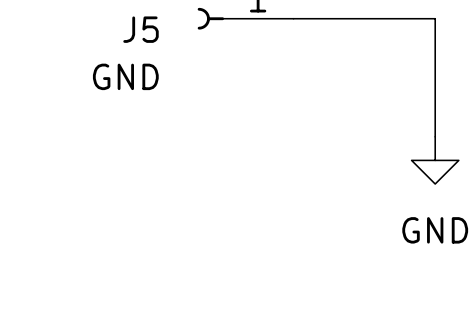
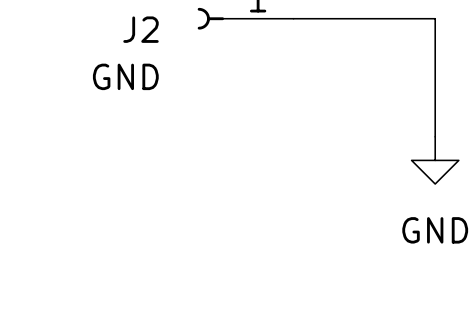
J5 name: J5 (141, 29) -> J2 (141, 29)

